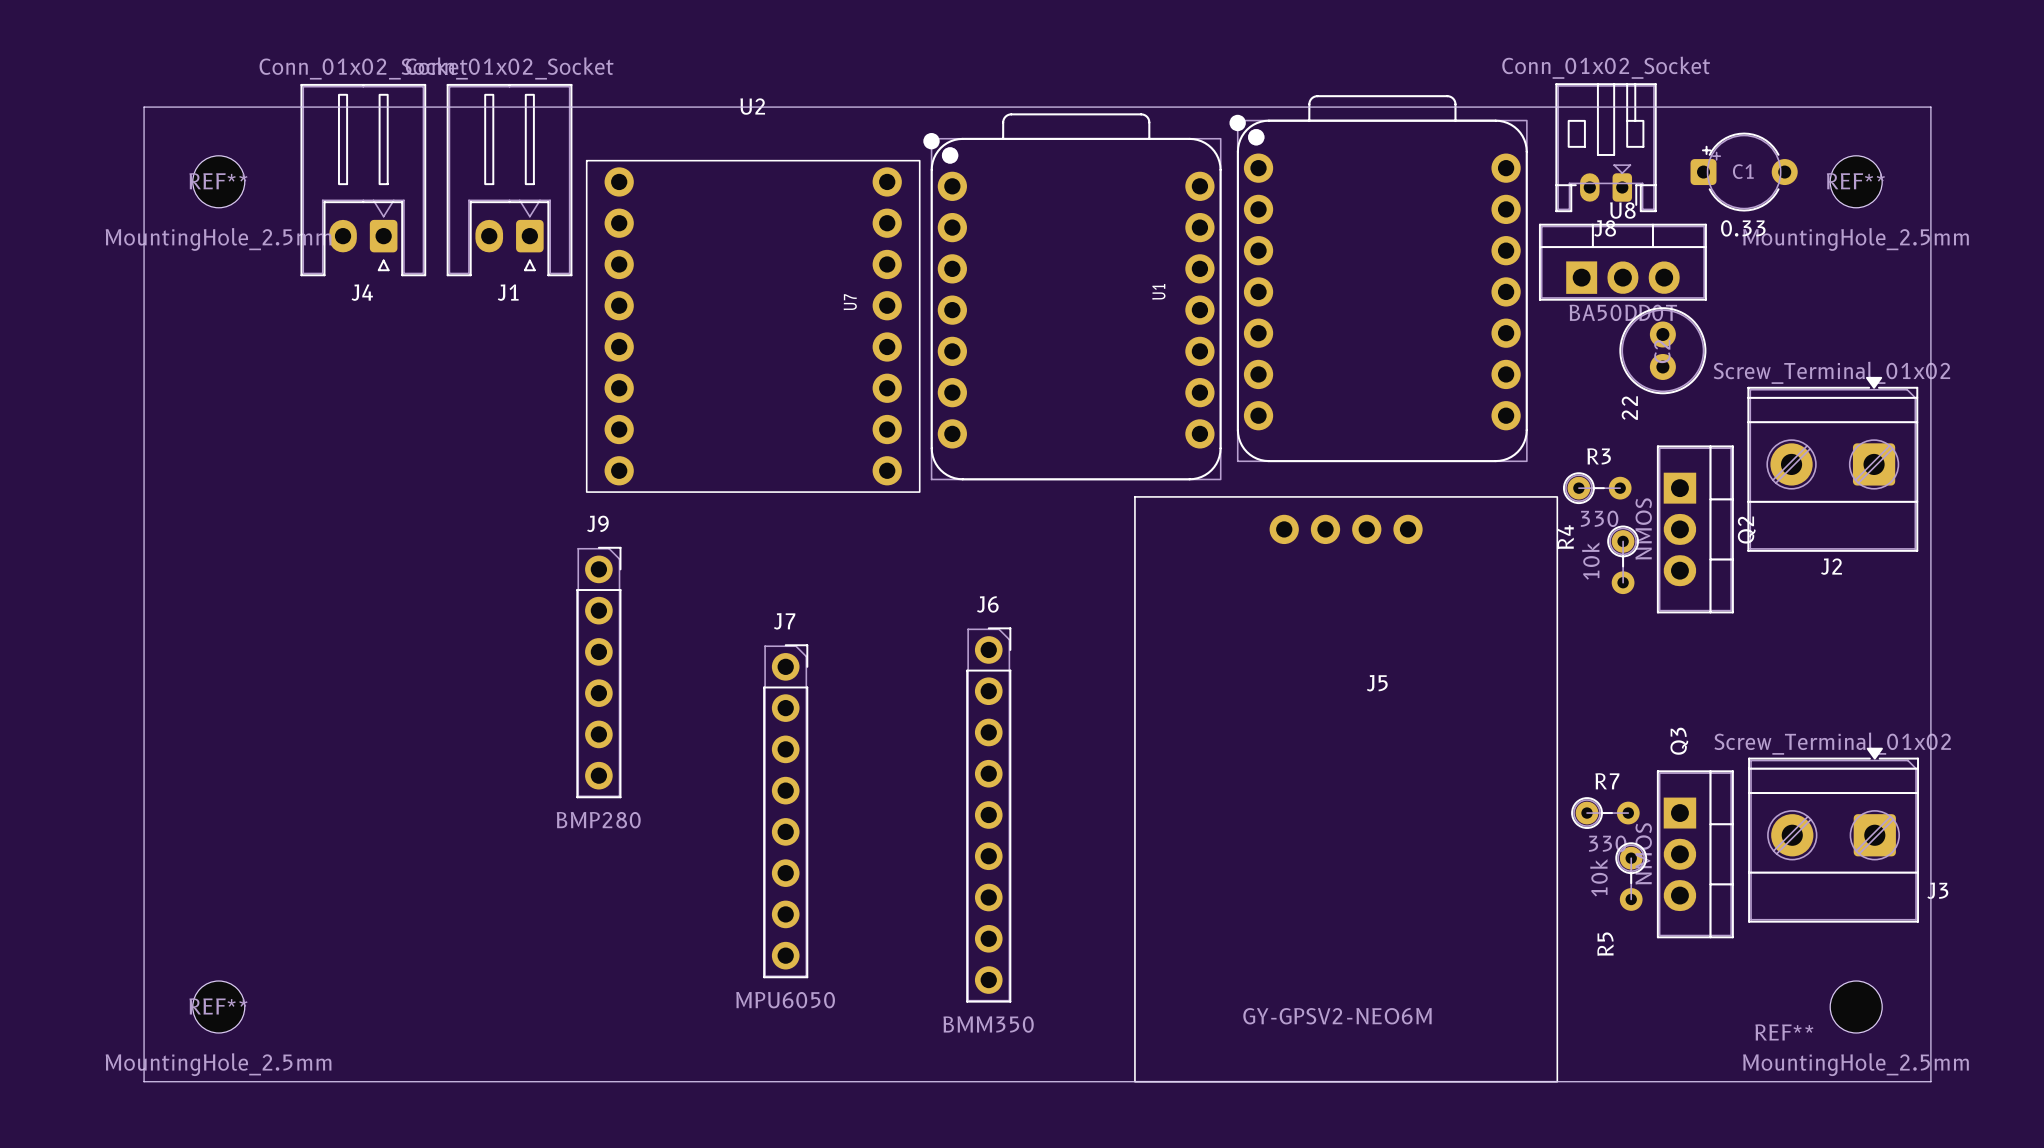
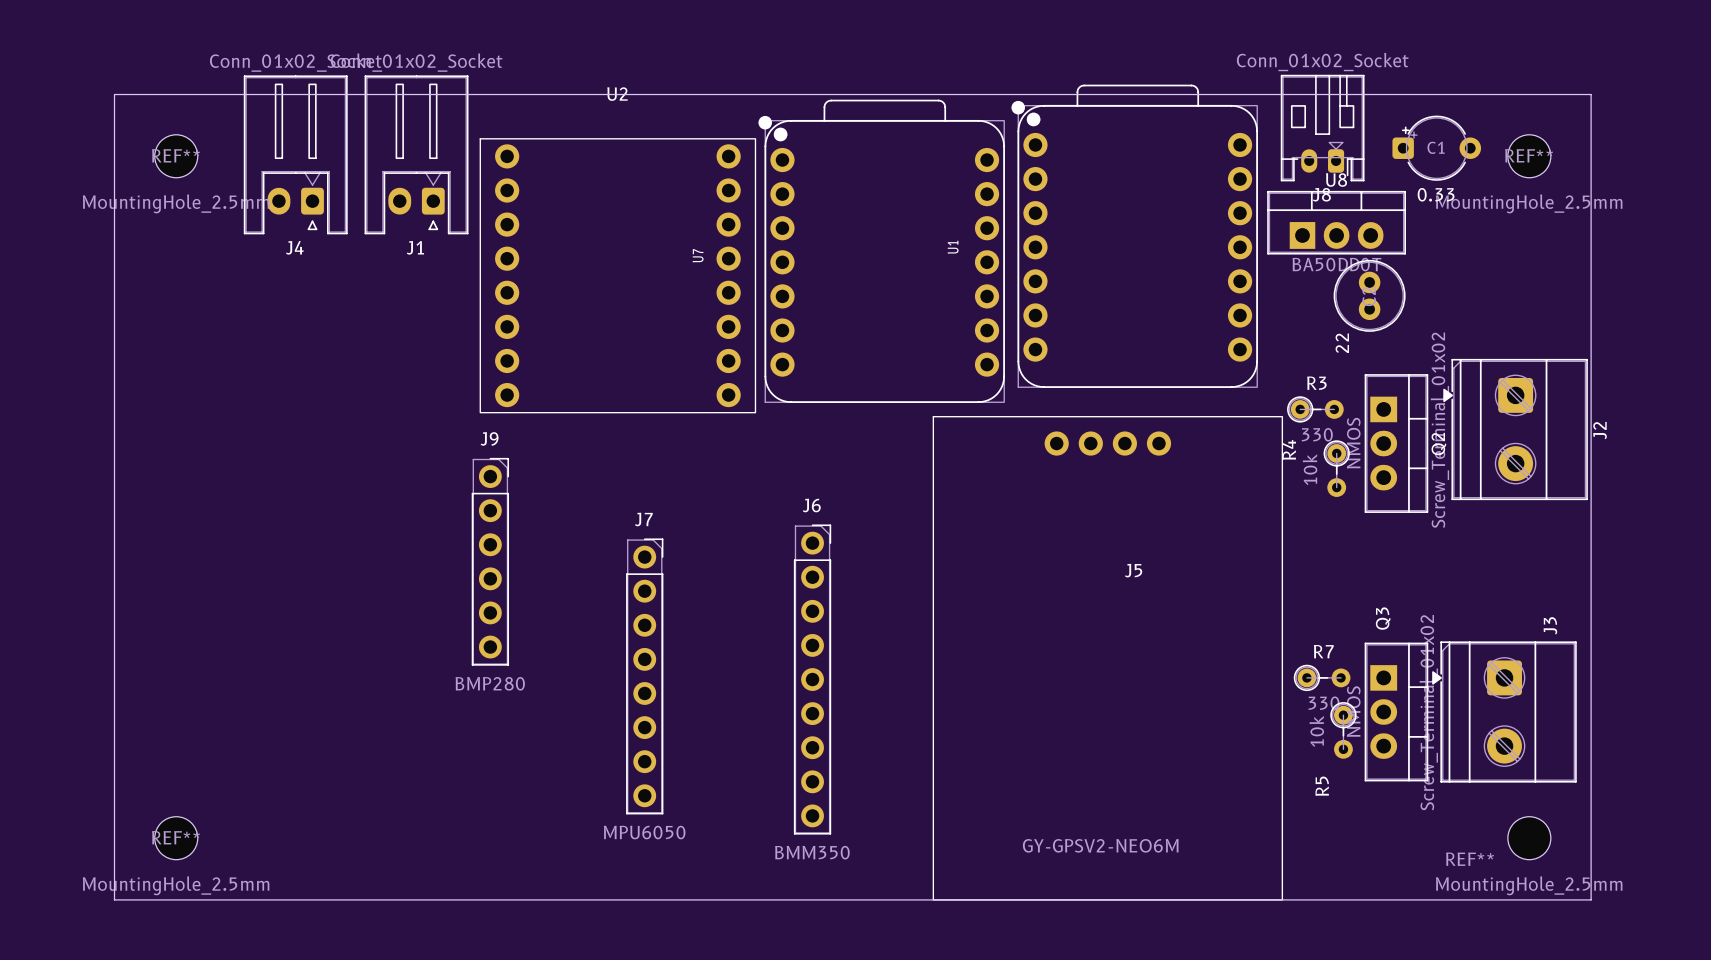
J2 rotation: 0° (1832, 464) -> 90° counterclockwise (1515, 429)
J3 rotation: 0° (1833, 835) -> 90° counterclockwise (1504, 712)

